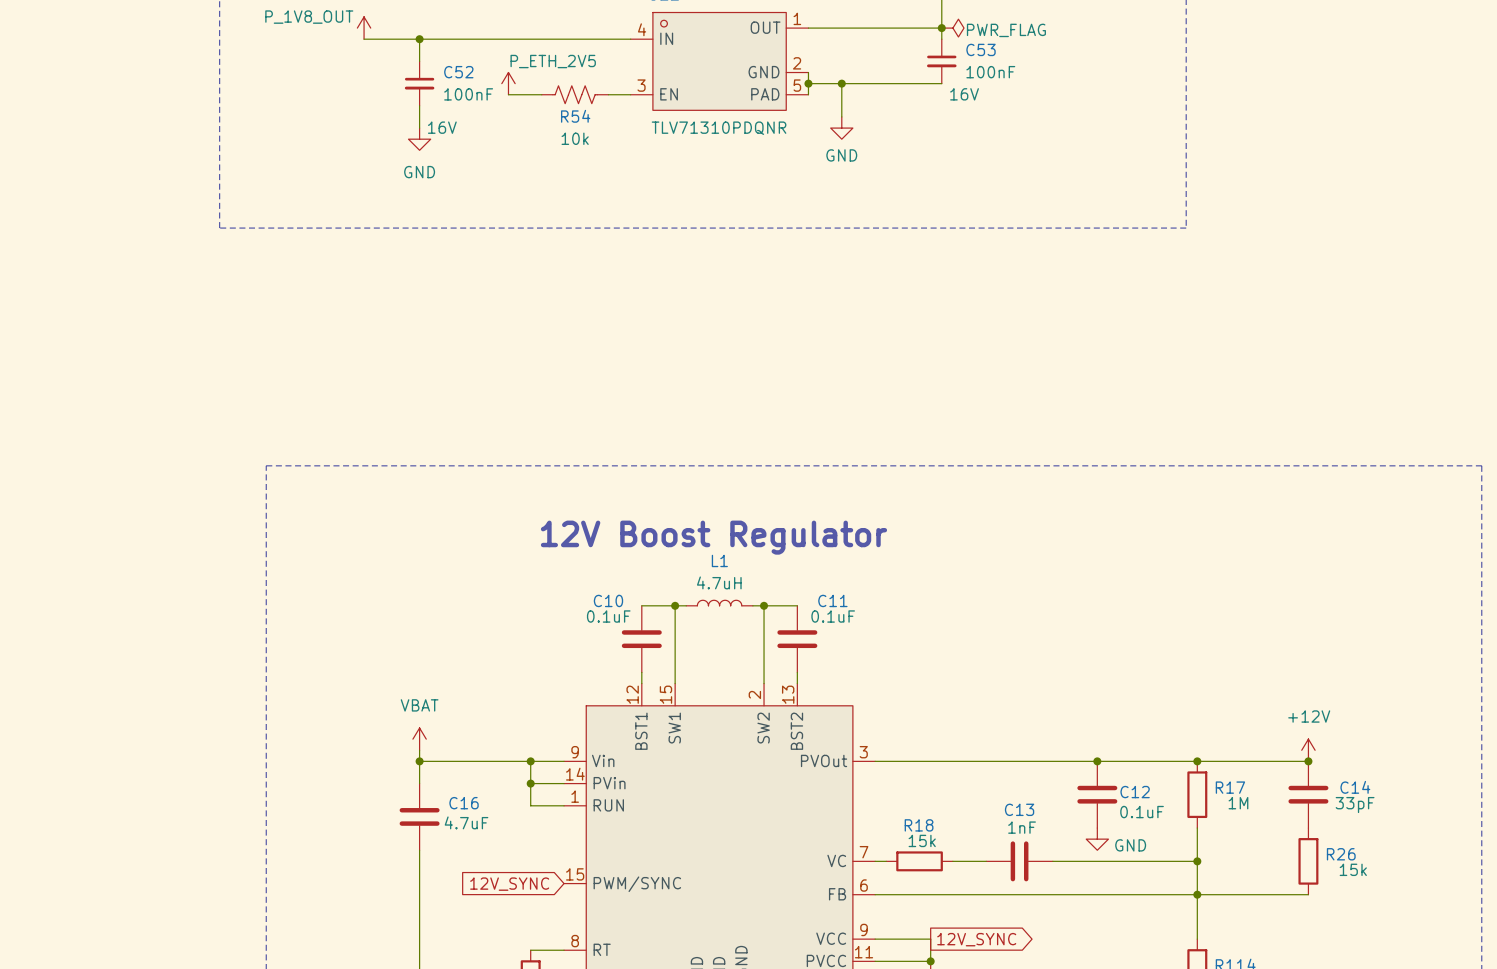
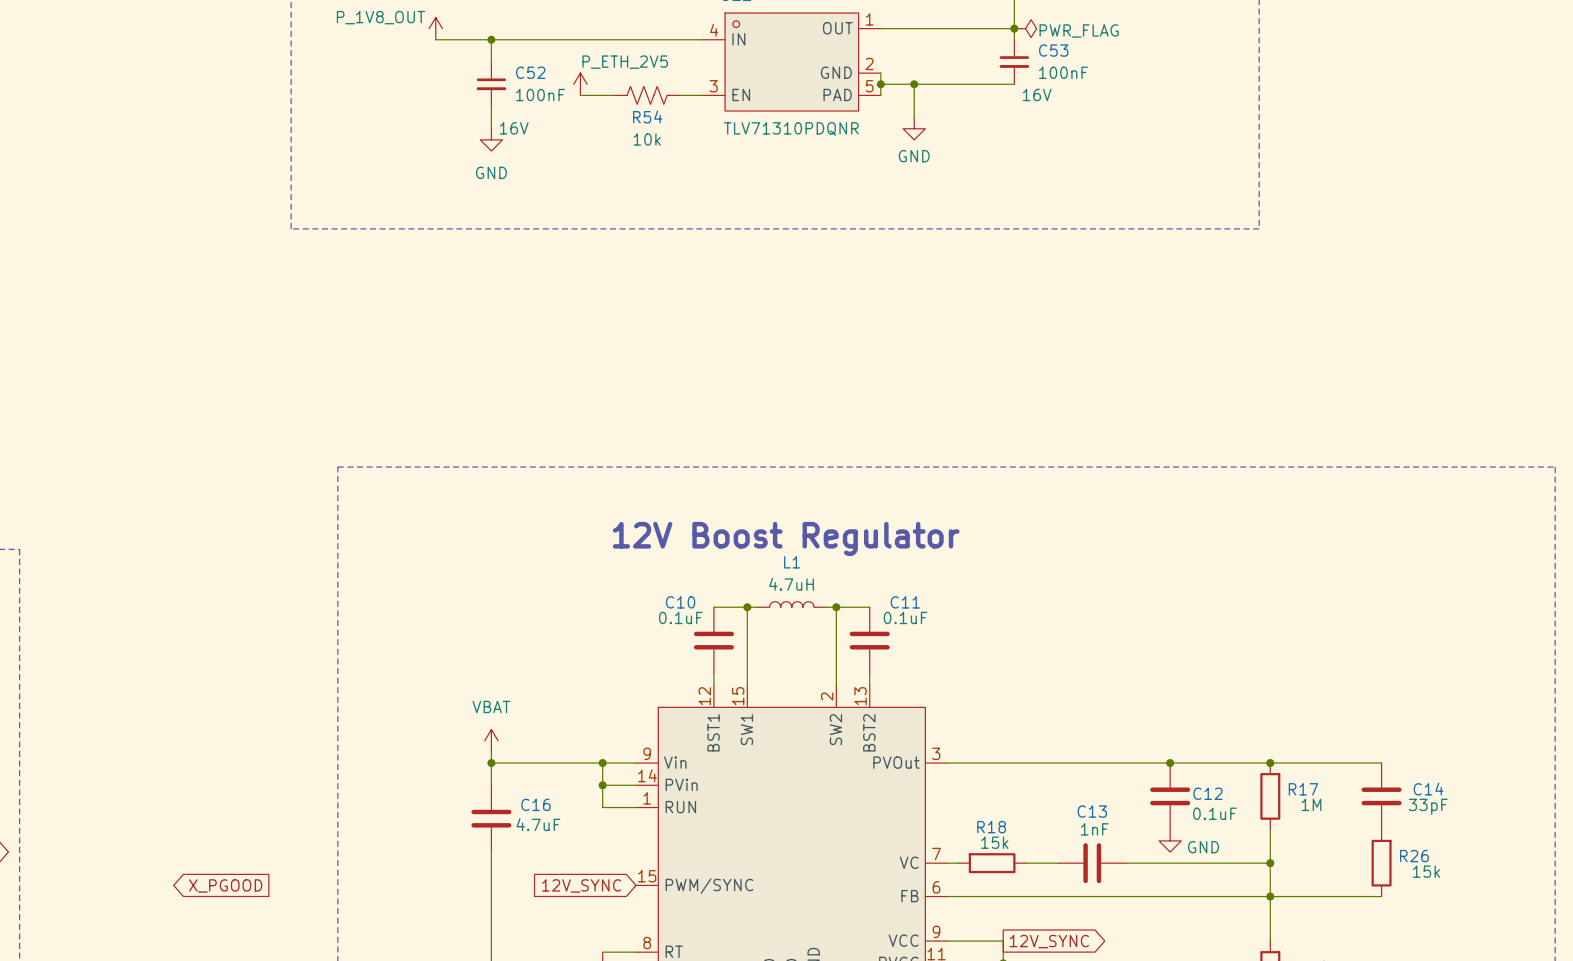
power symbol: +12V (1308, 750) -> none
junction: (1308, 761) -> none
global label: none -> X_PGOOD (225, 885)

